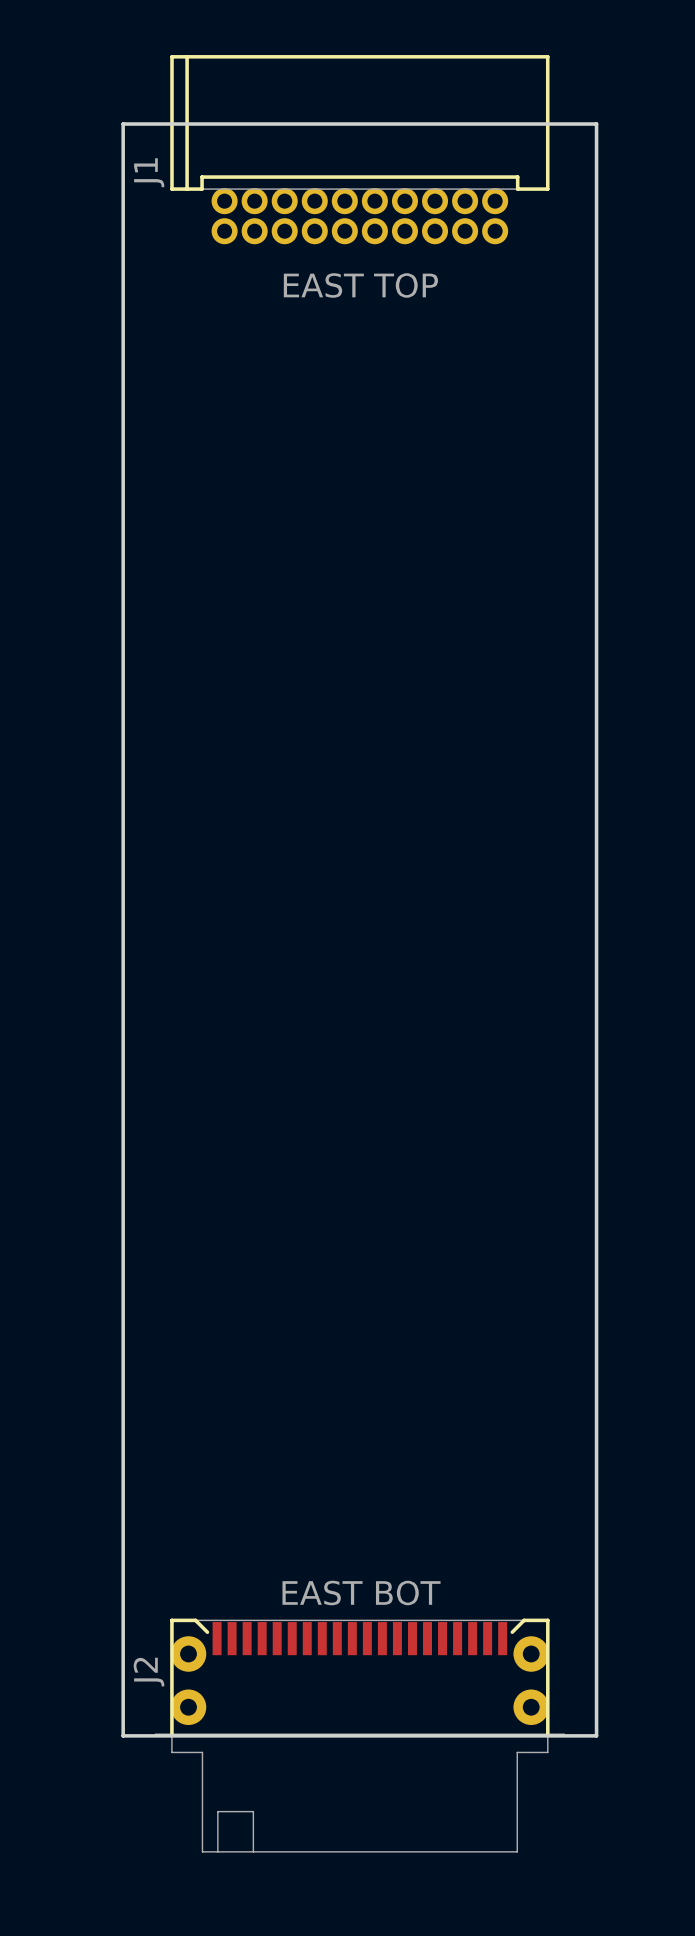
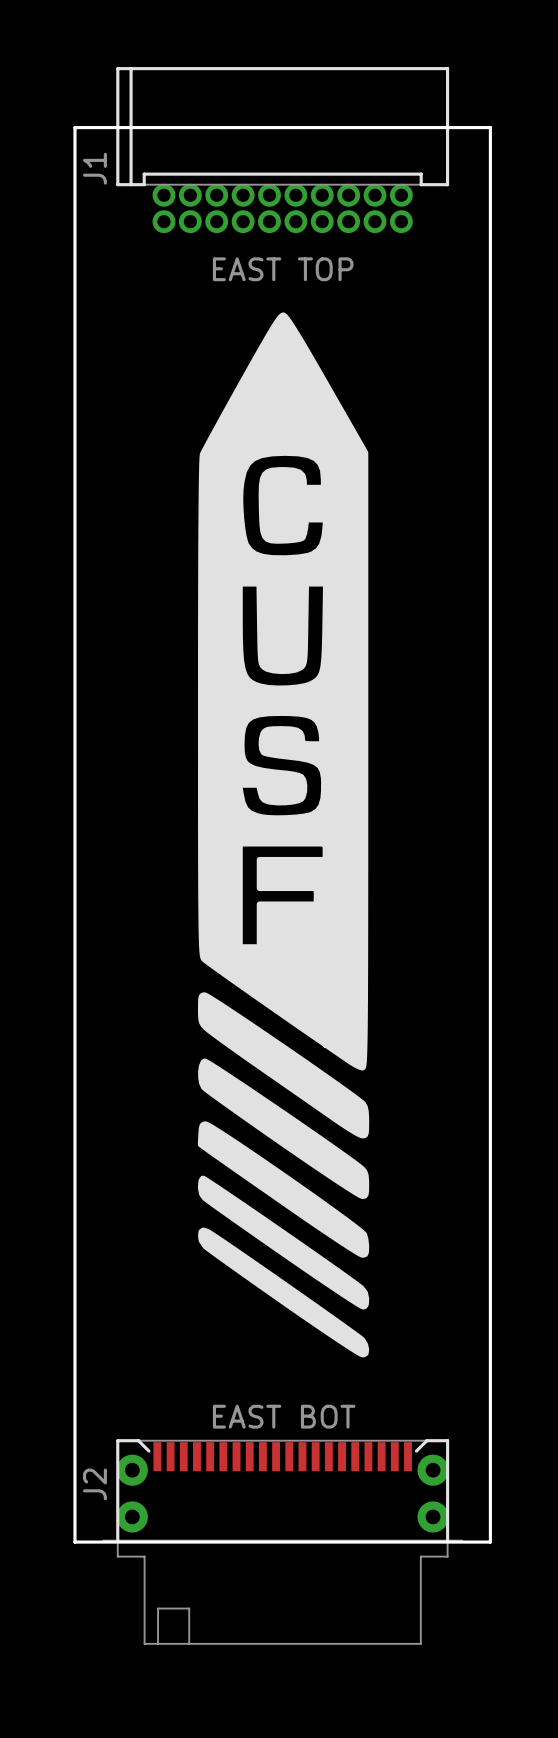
drawing: none -> [197, 312, 370, 1358]

